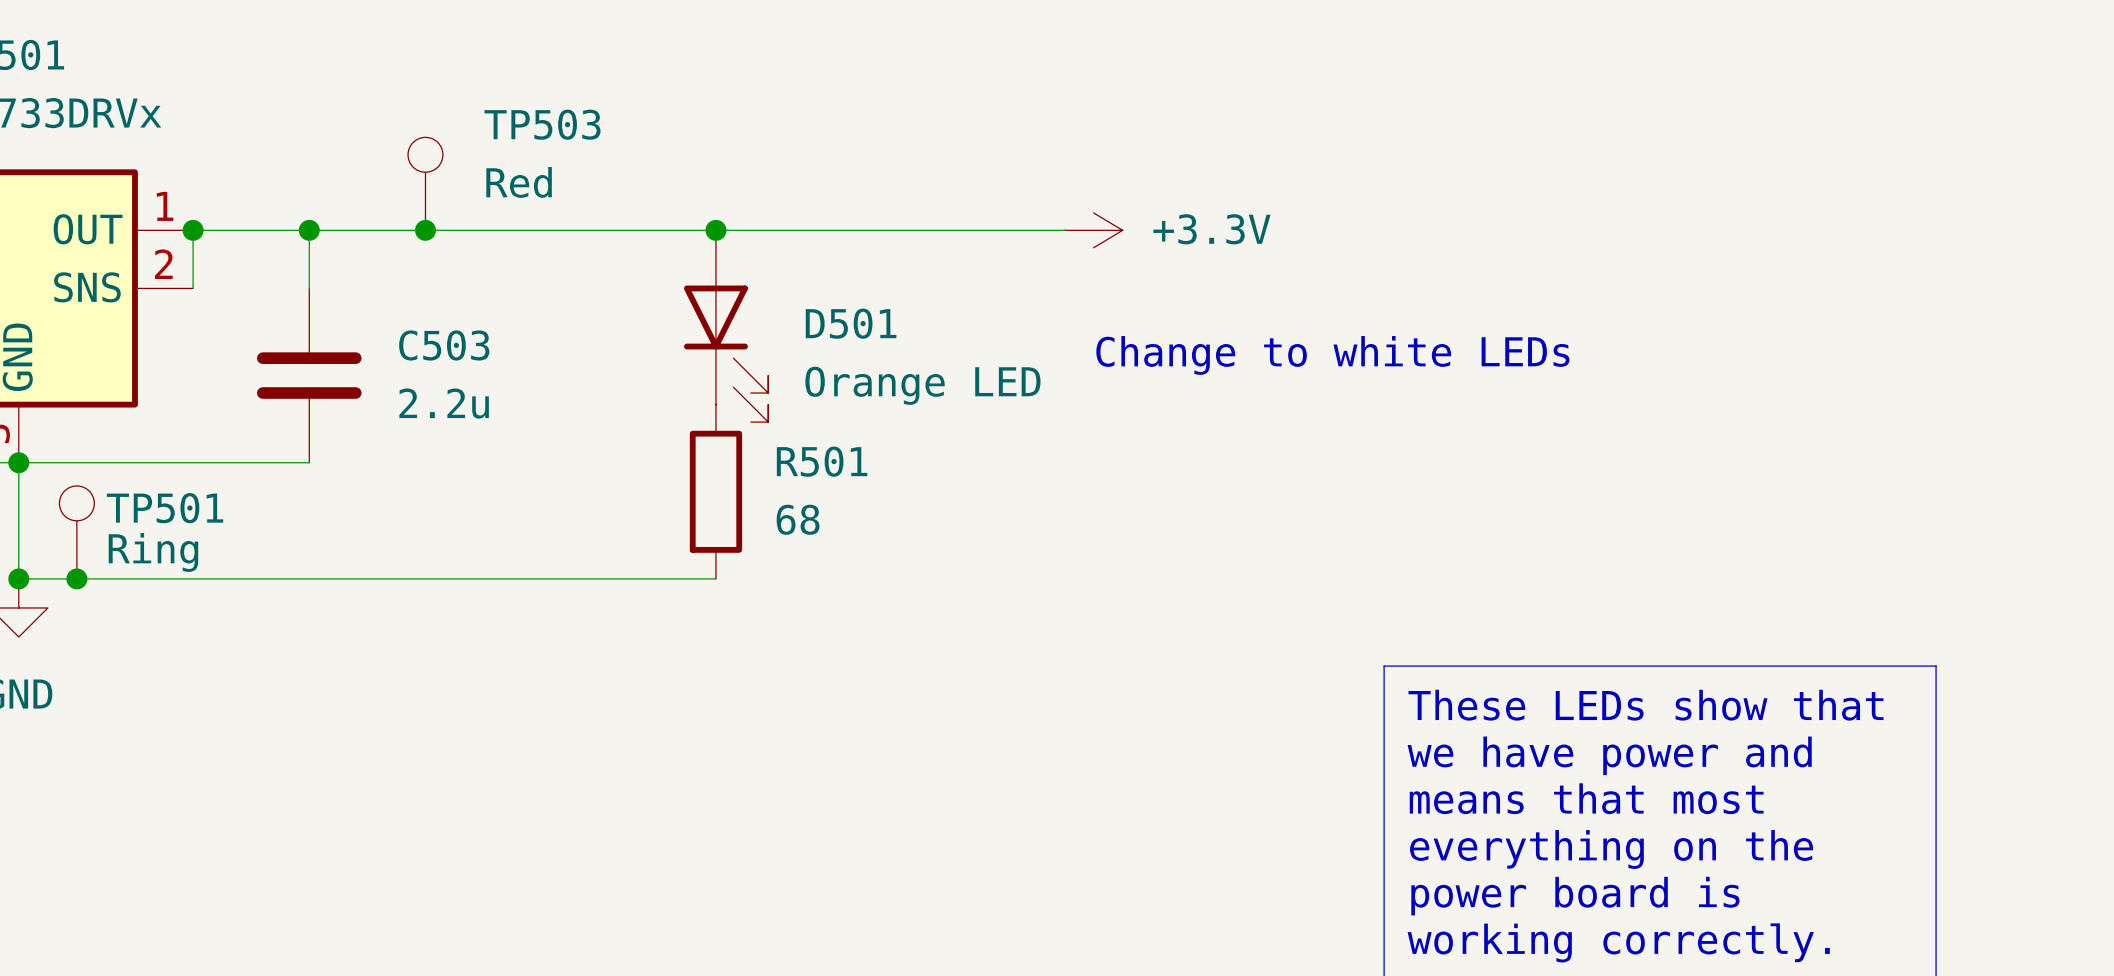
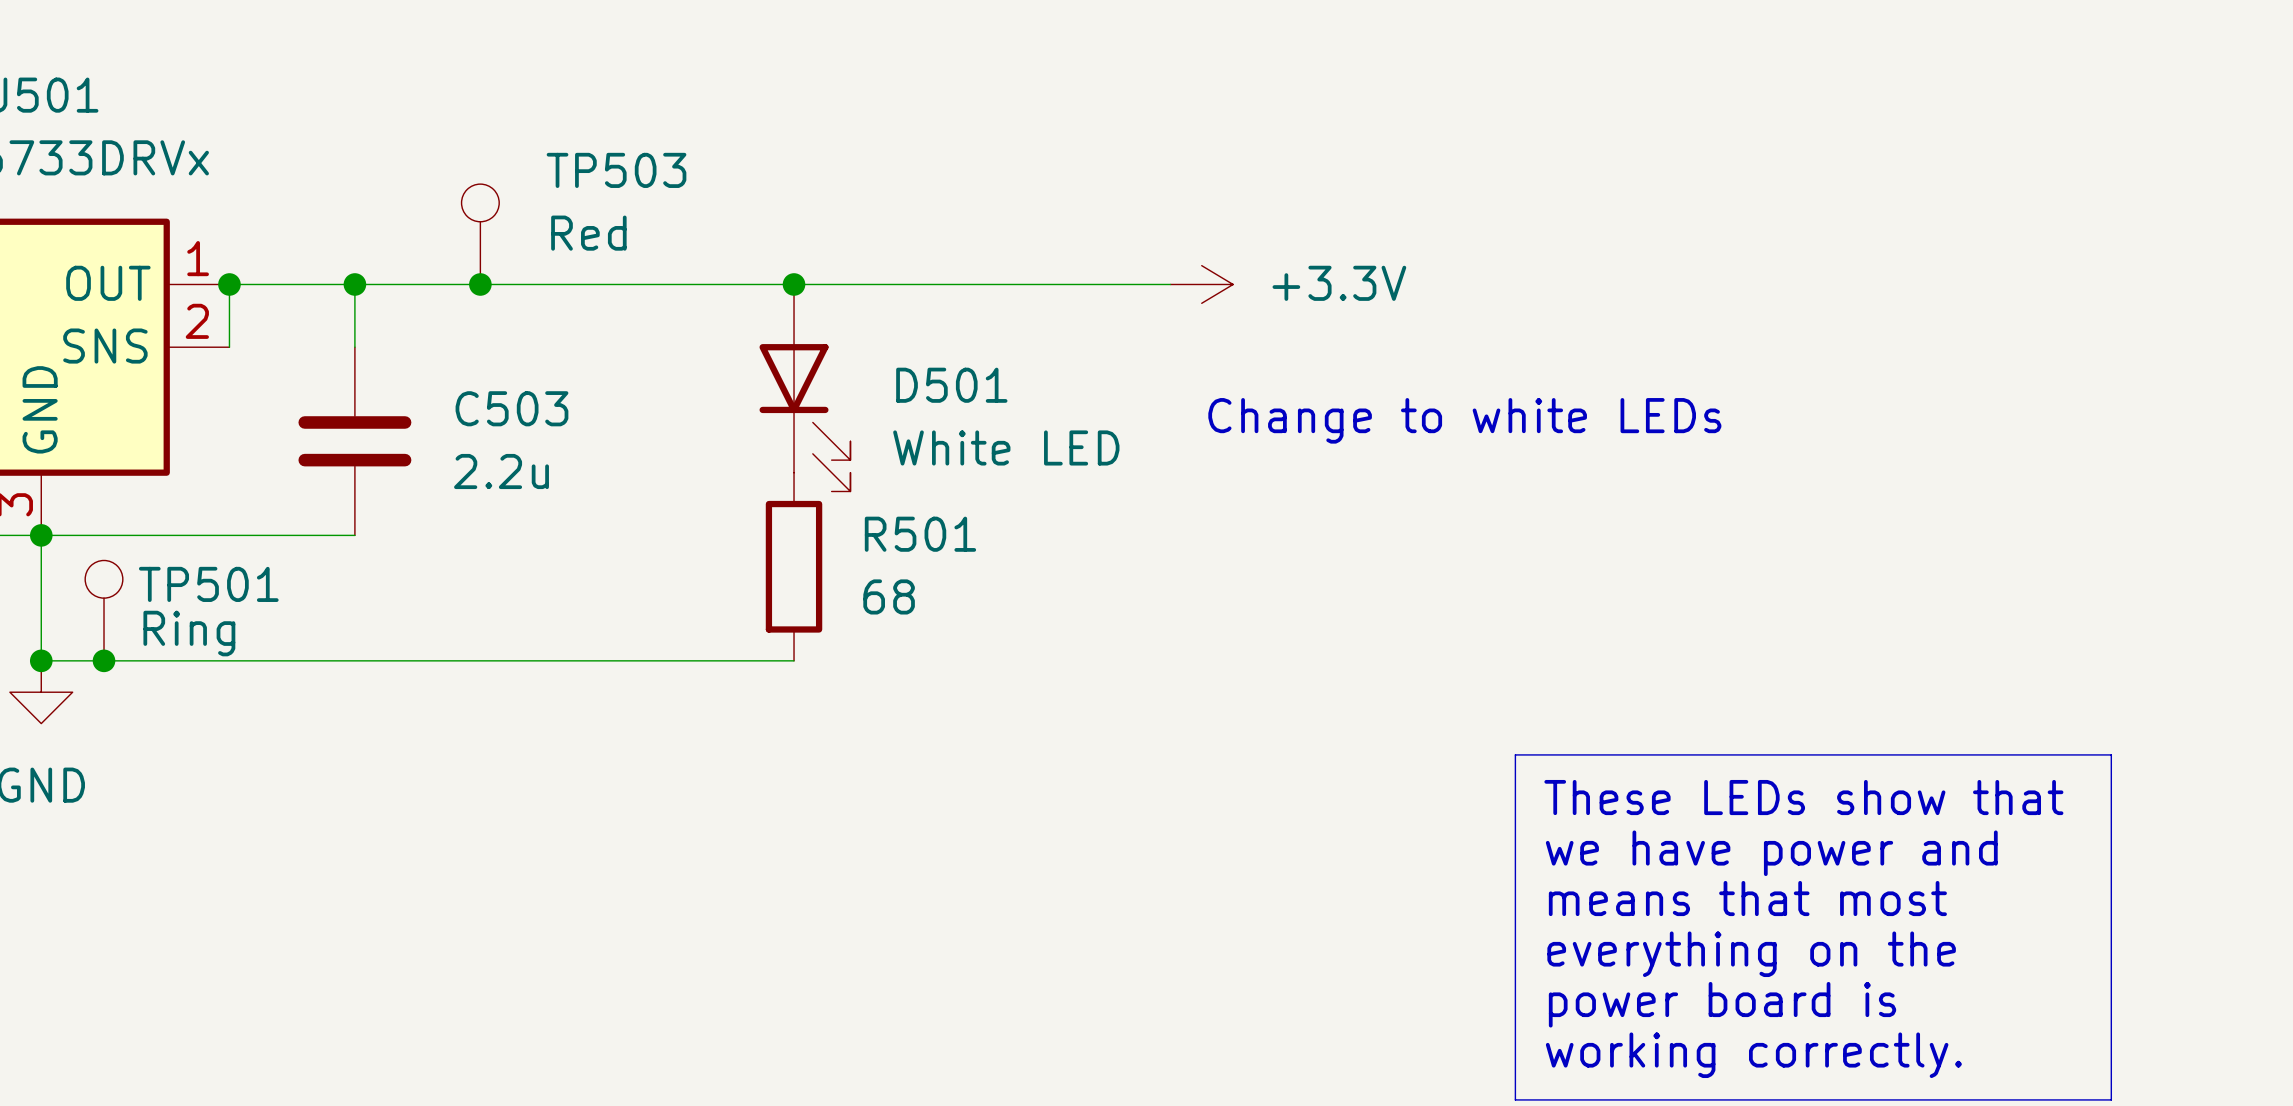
D501 value: Orange LED (922, 385) -> White LED (1006, 447)

